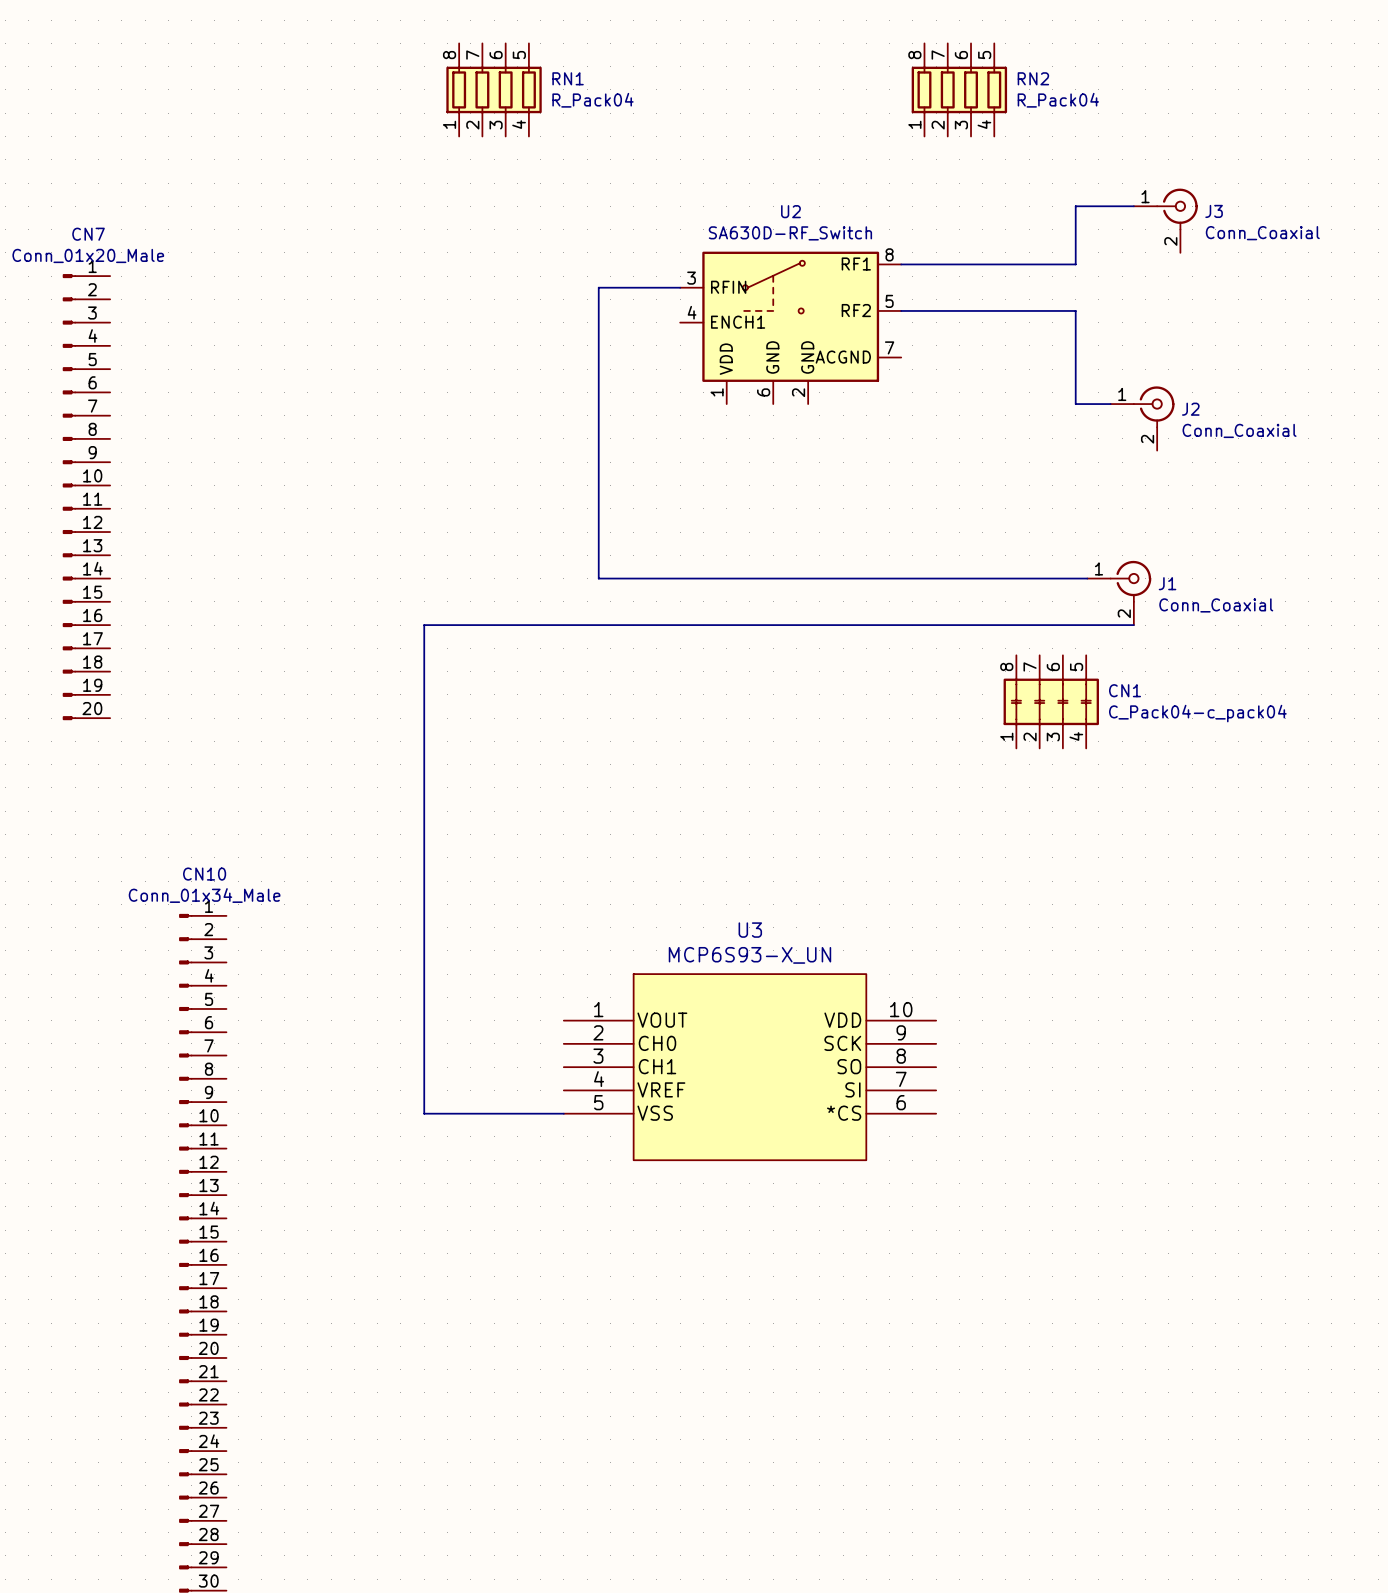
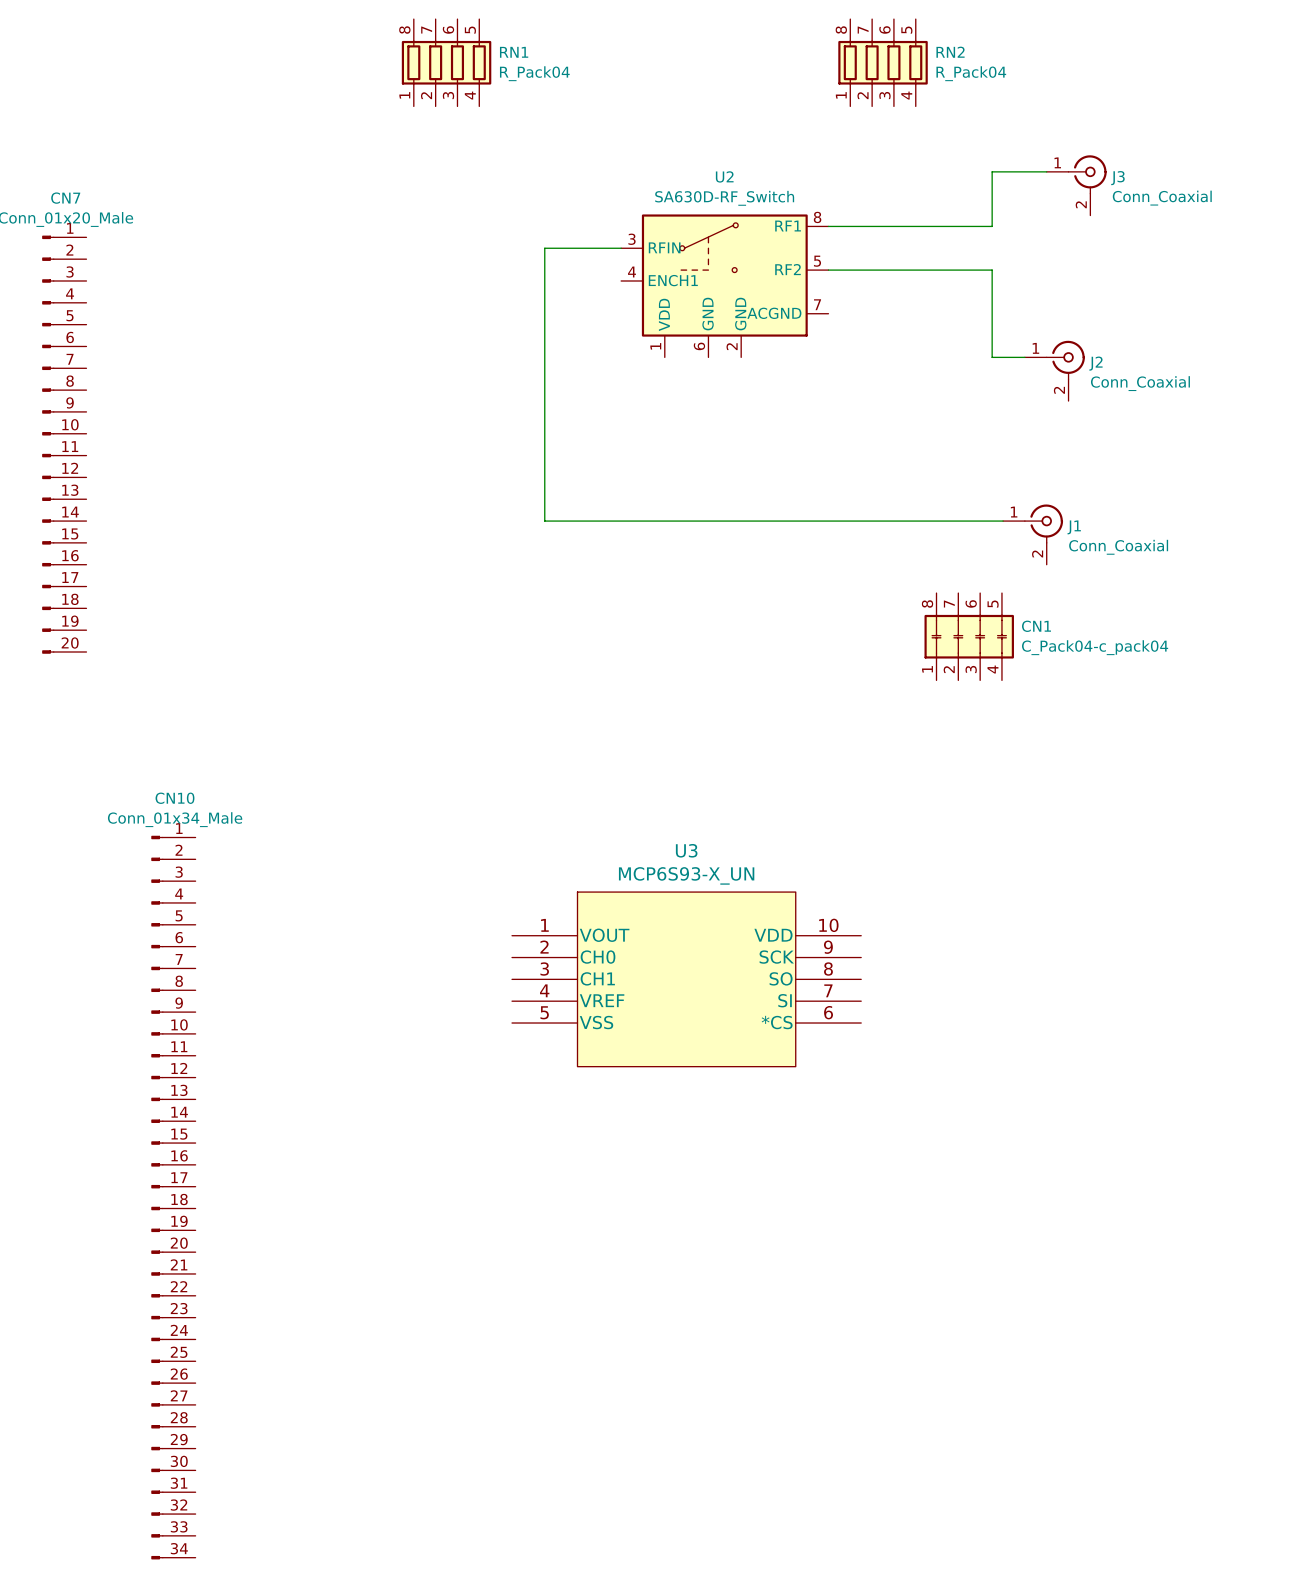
wire: (1133, 625) (424, 625) (424, 1113) (563, 1113) -> none

